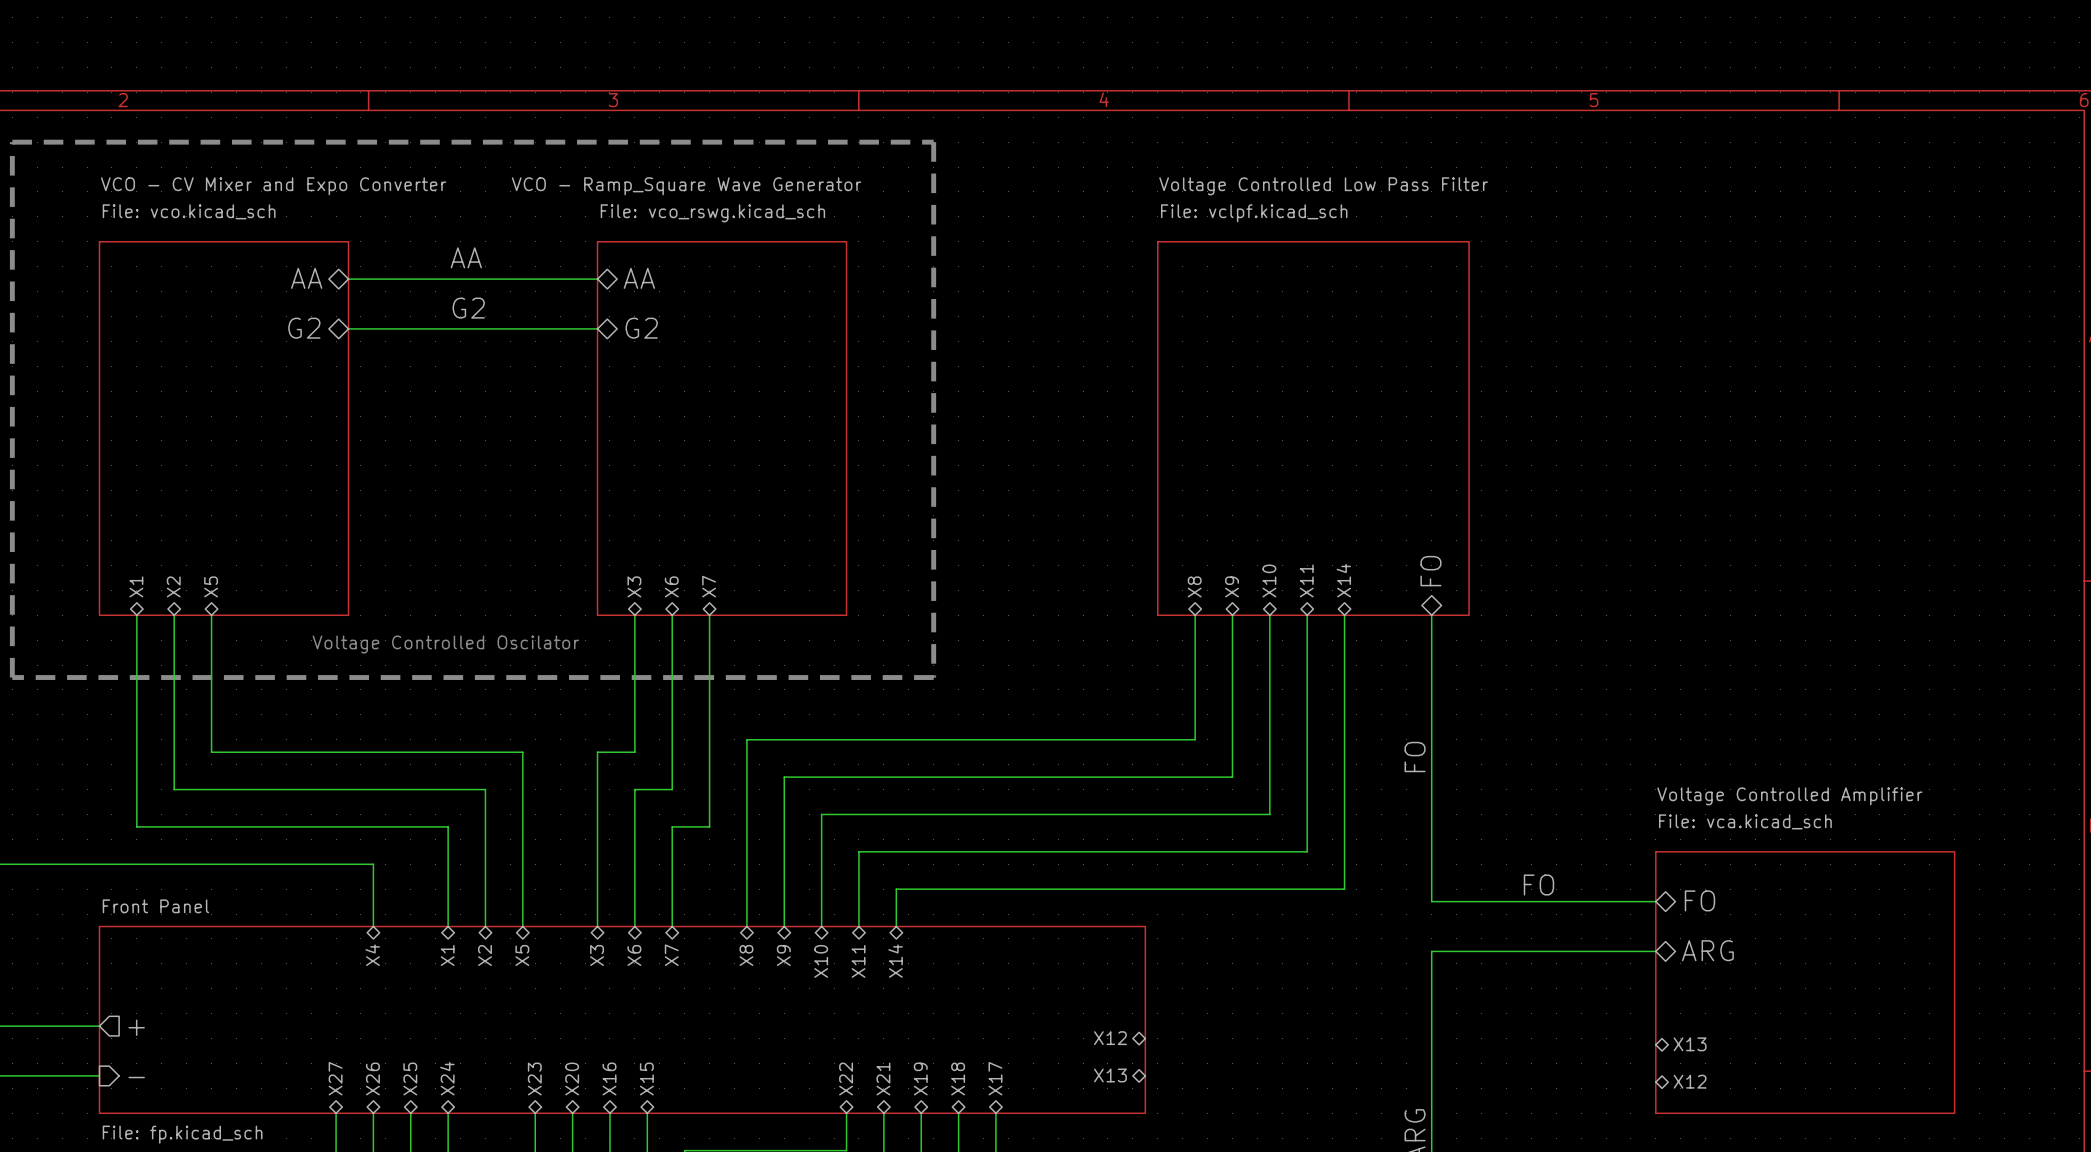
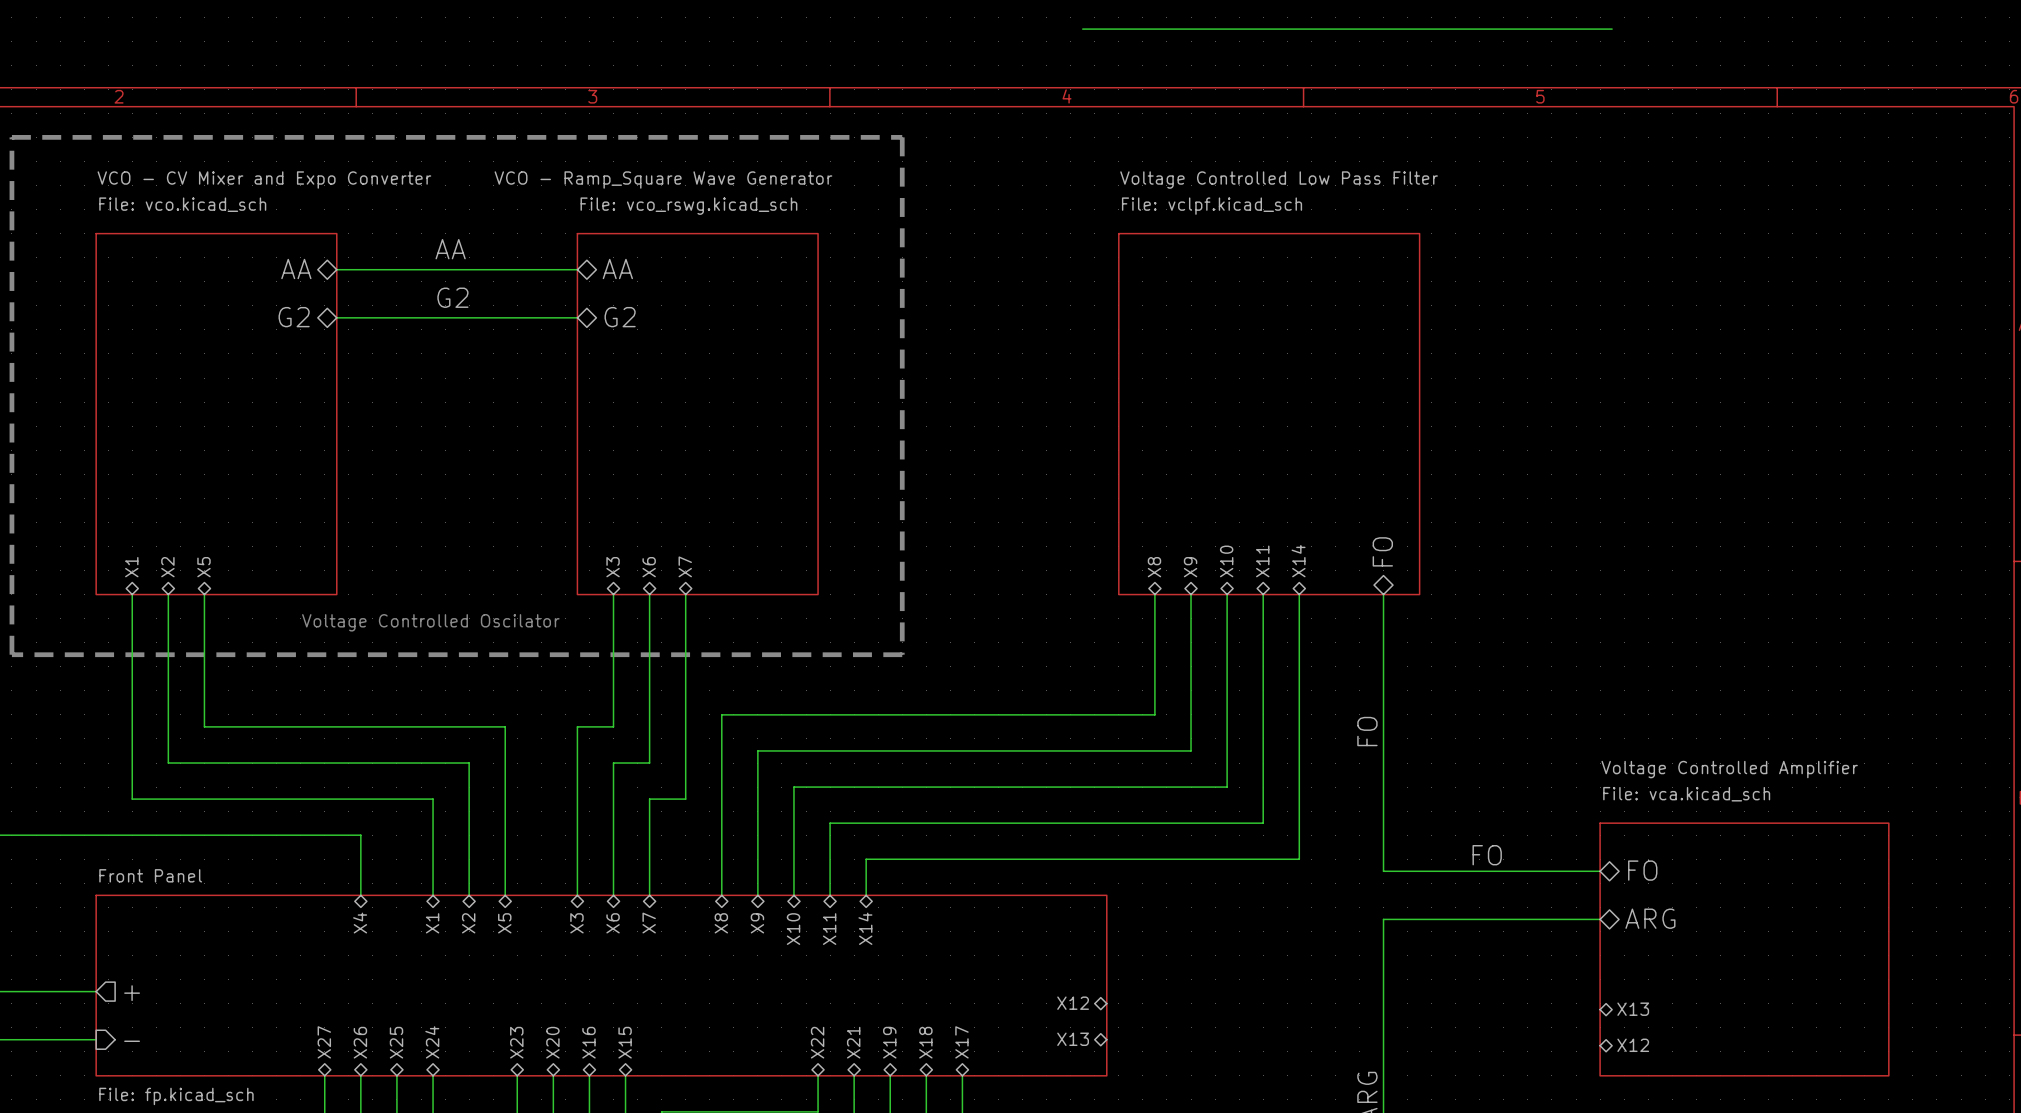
wire: none -> (1082, 29) (1612, 29)

